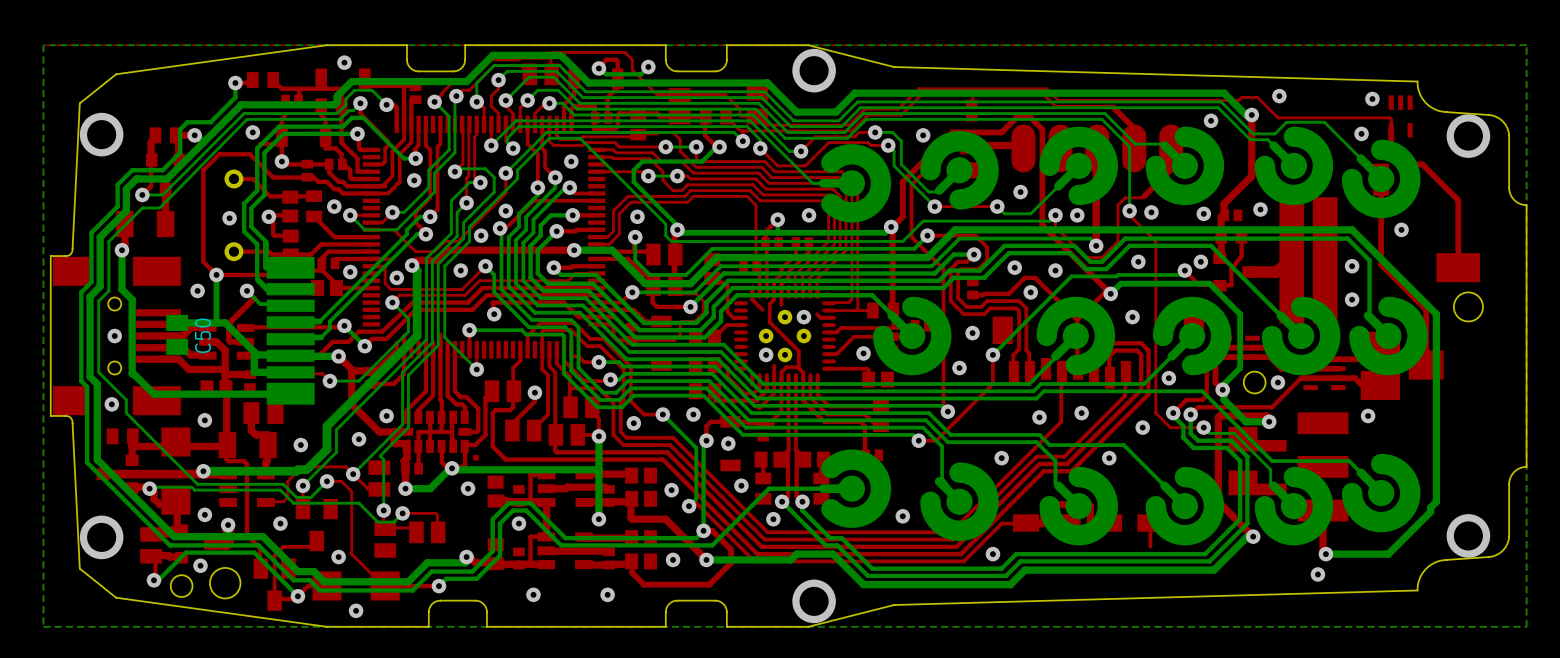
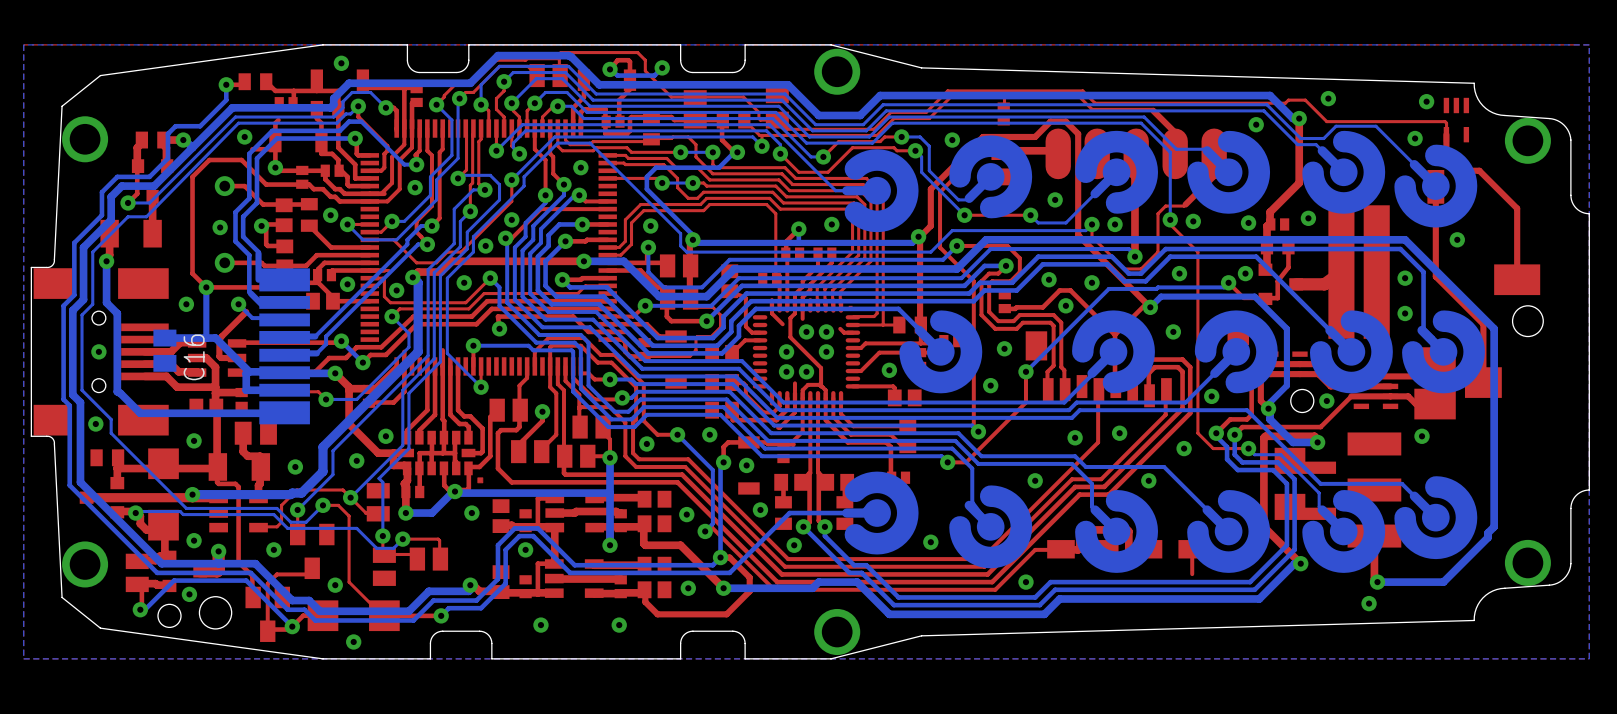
C50 name: C50 (202, 335) -> C16 (194, 357)

